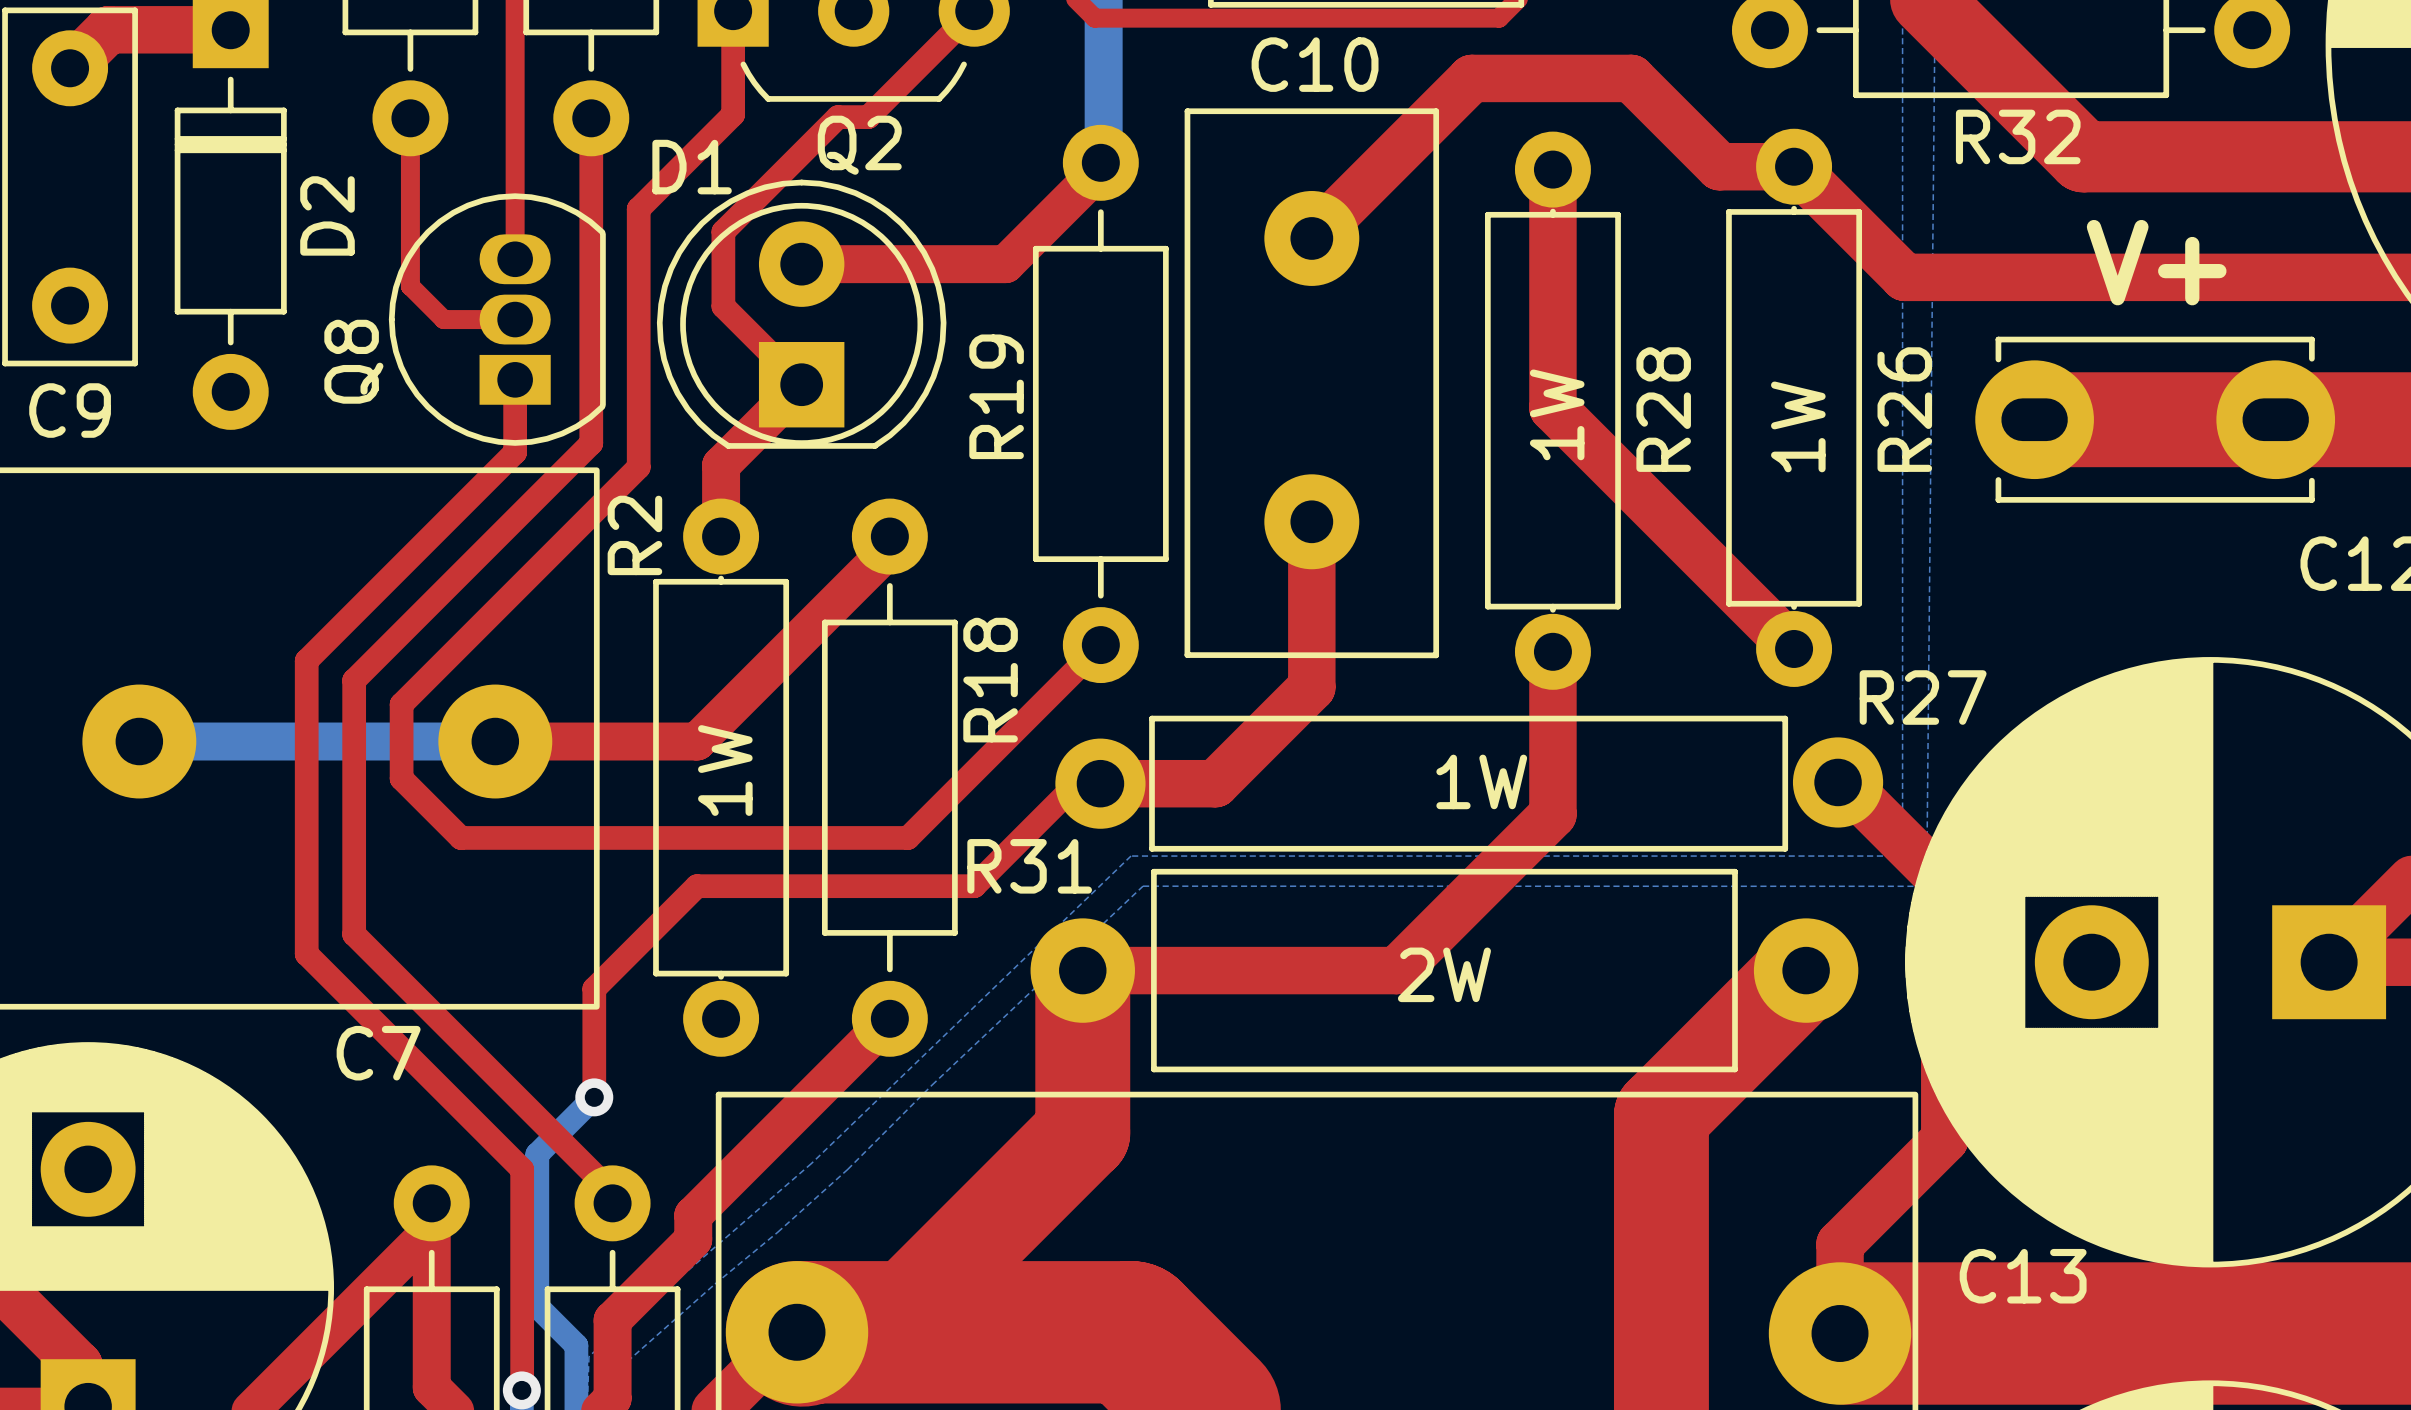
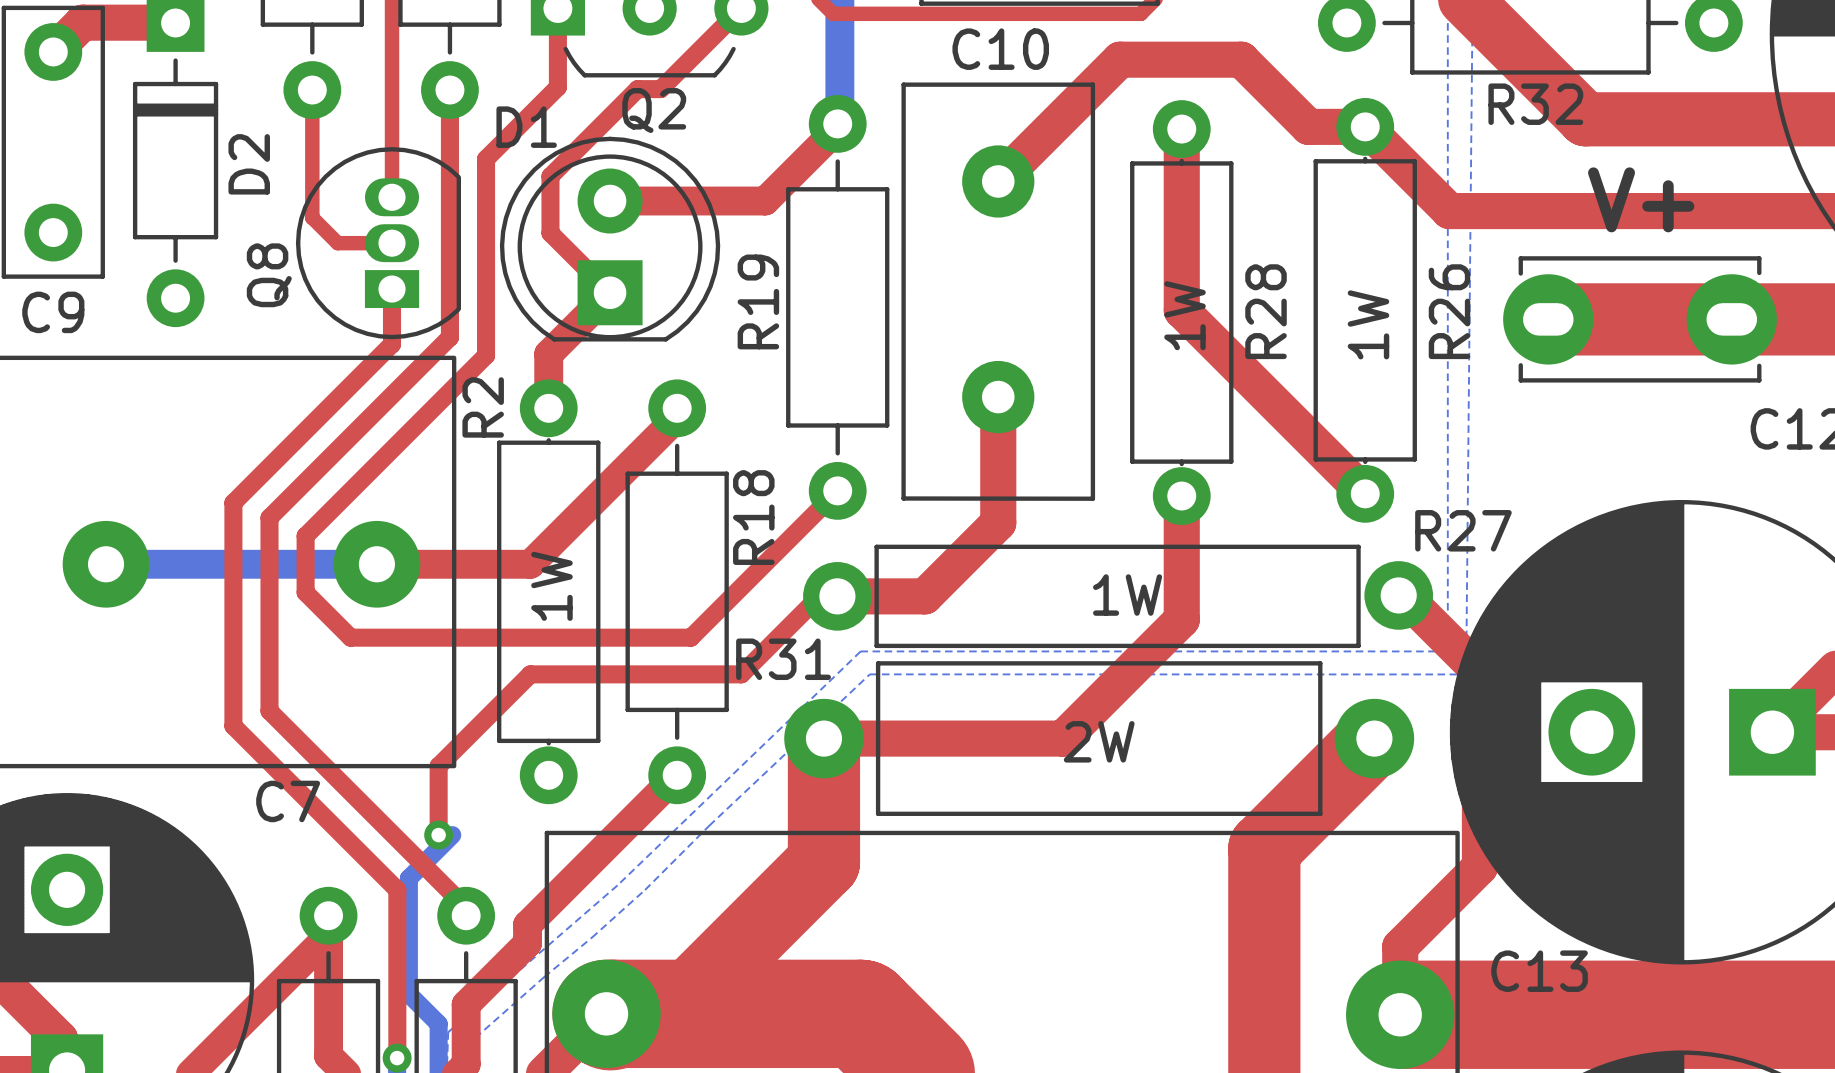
top track: (594, 988) (594, 1097) -> (452, 752) (438, 766) (438, 835)
via position: (594, 1097) -> (438, 835)

